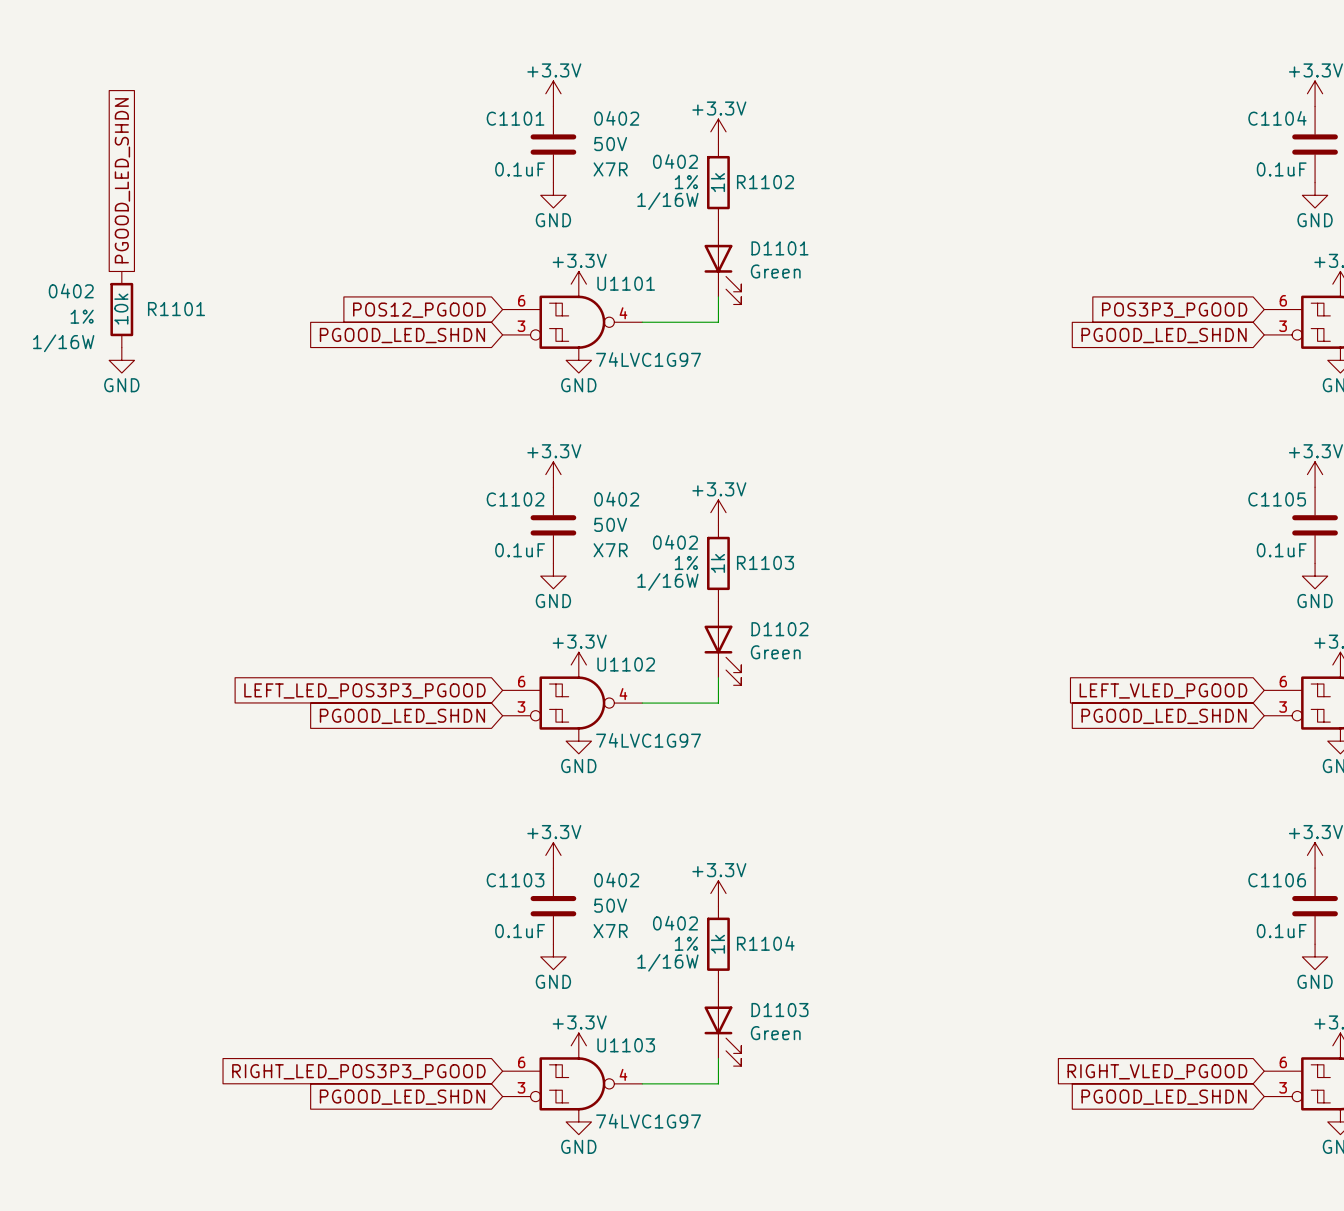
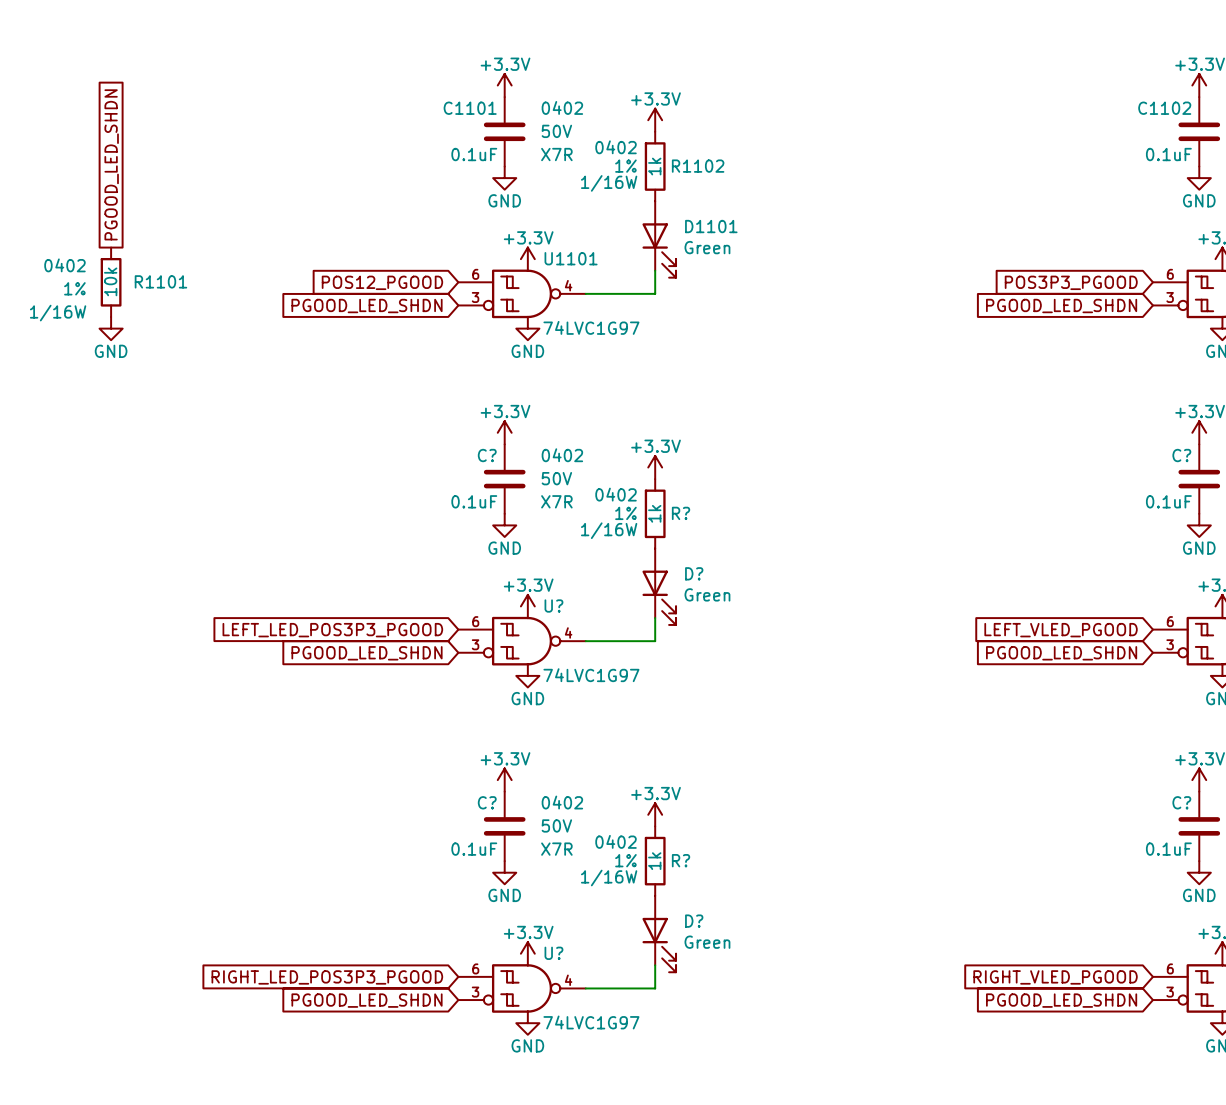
C1104 name: C1104 (1277, 118) -> C1102 (1164, 108)
C1102 name: C1102 (515, 499) -> C? (487, 455)
C1105 name: C1105 (1277, 499) -> C? (1181, 455)
R1103 name: R1103 (765, 562) -> R? (681, 513)
D1102 name: D1102 (779, 629) -> D? (694, 573)
U1102 name: U1102 (626, 664) -> U? (553, 606)
C1103 name: C1103 (515, 880) -> C? (487, 802)
C1106 name: C1106 (1277, 880) -> C? (1181, 802)
R1104 name: R1104 (765, 943) -> R? (681, 860)
D1103 name: D1103 (779, 1010) -> D? (694, 921)
U1103 name: U1103 (626, 1045) -> U? (553, 953)

